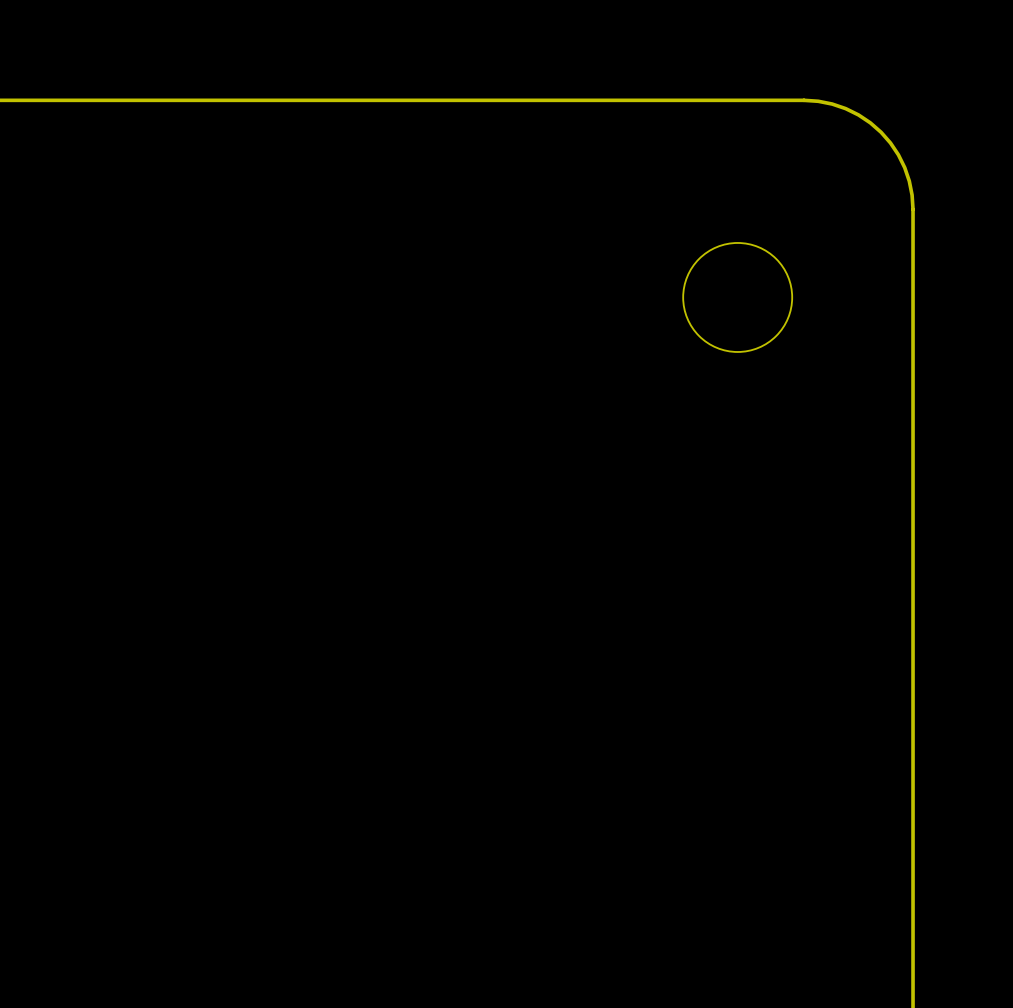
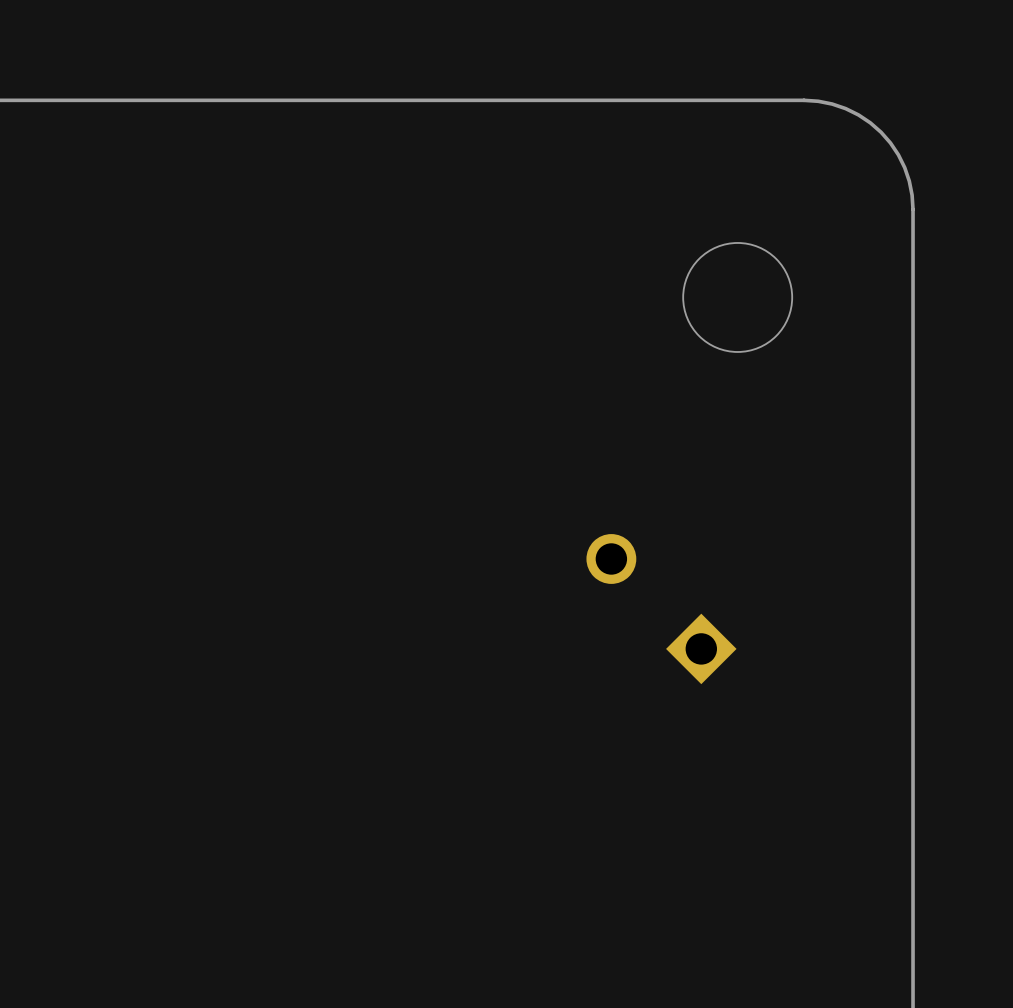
part: none -> (661, 609)

